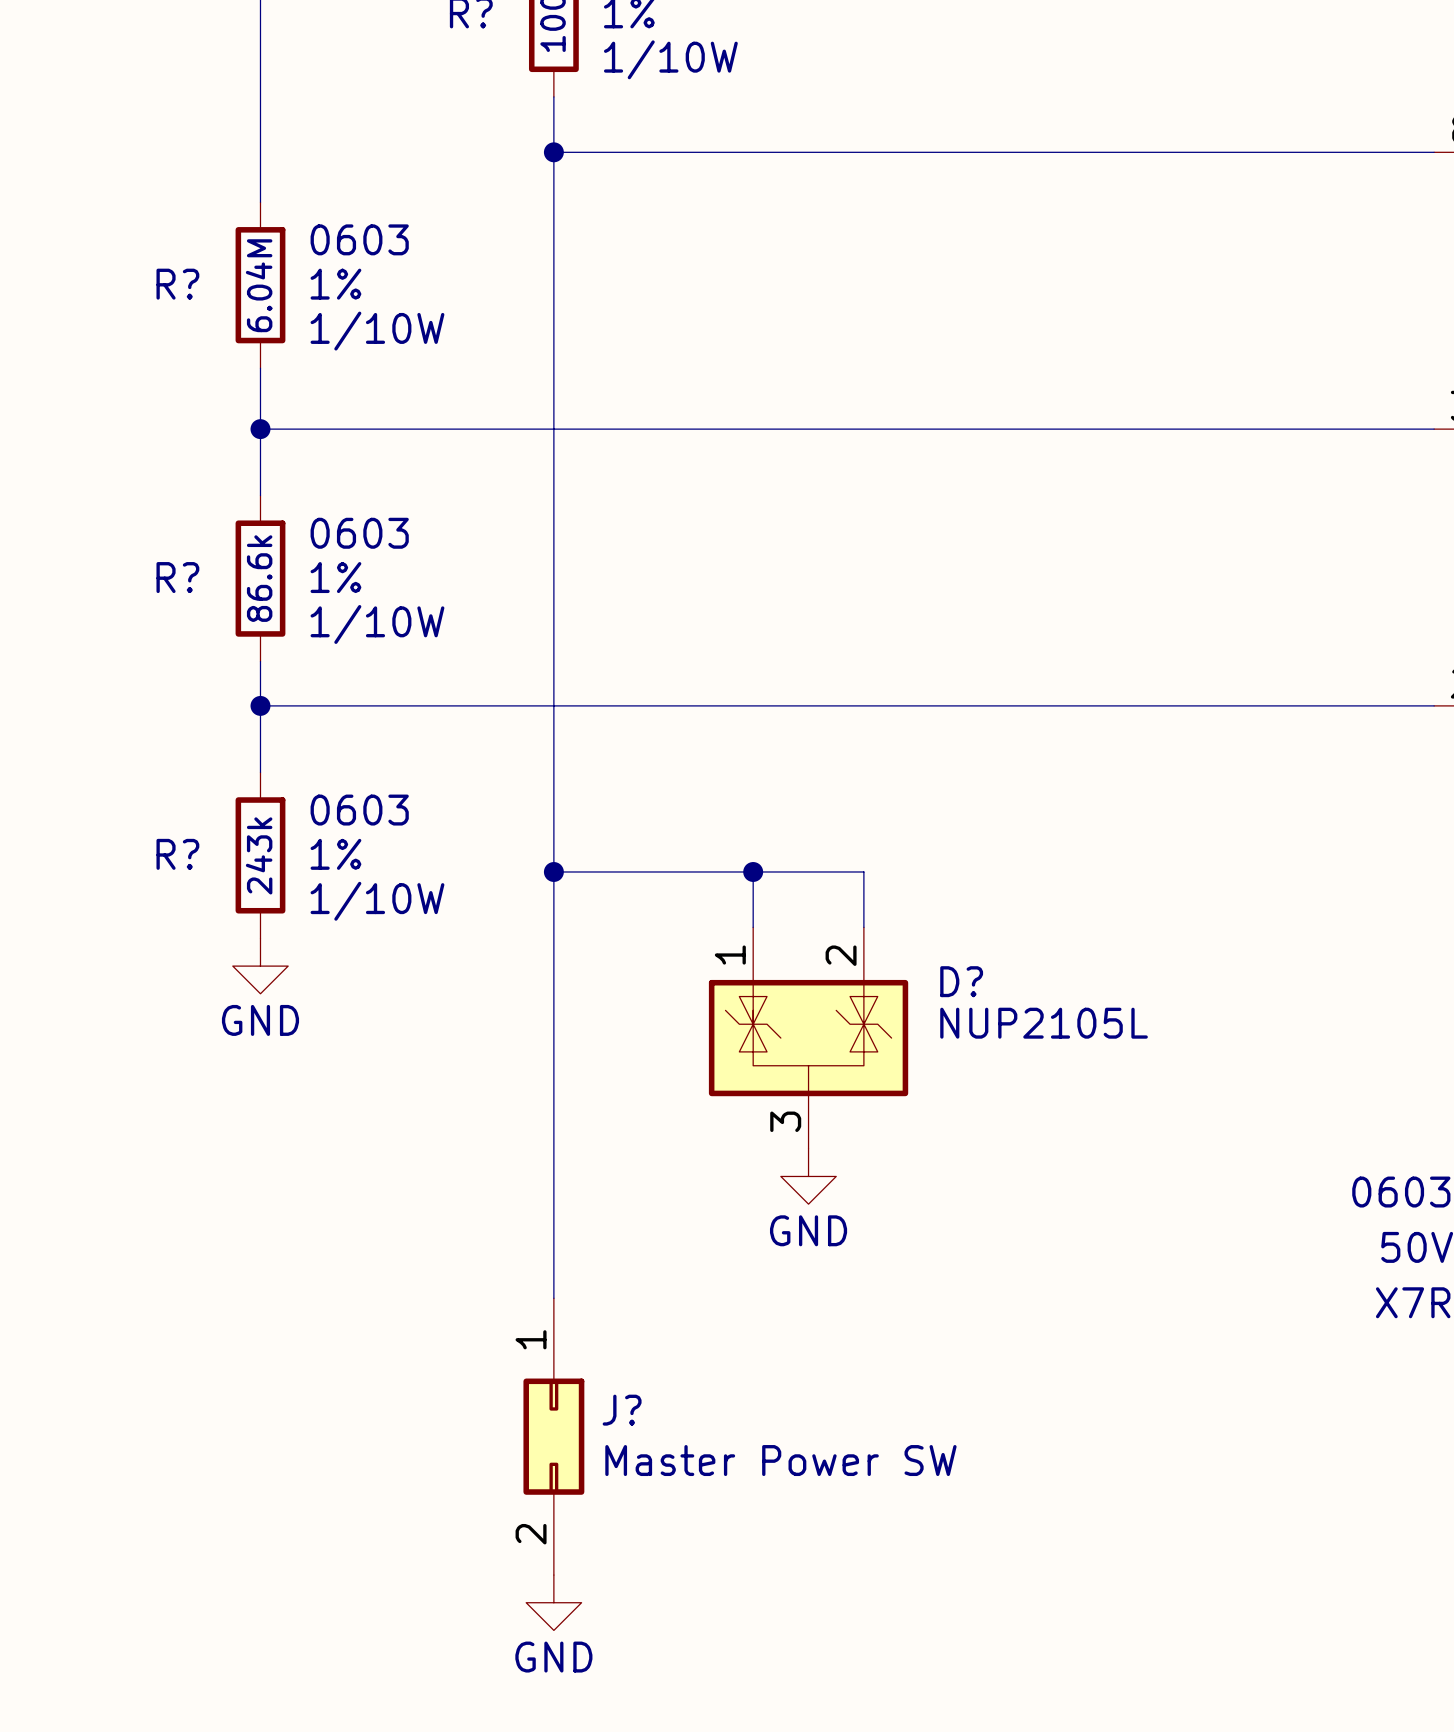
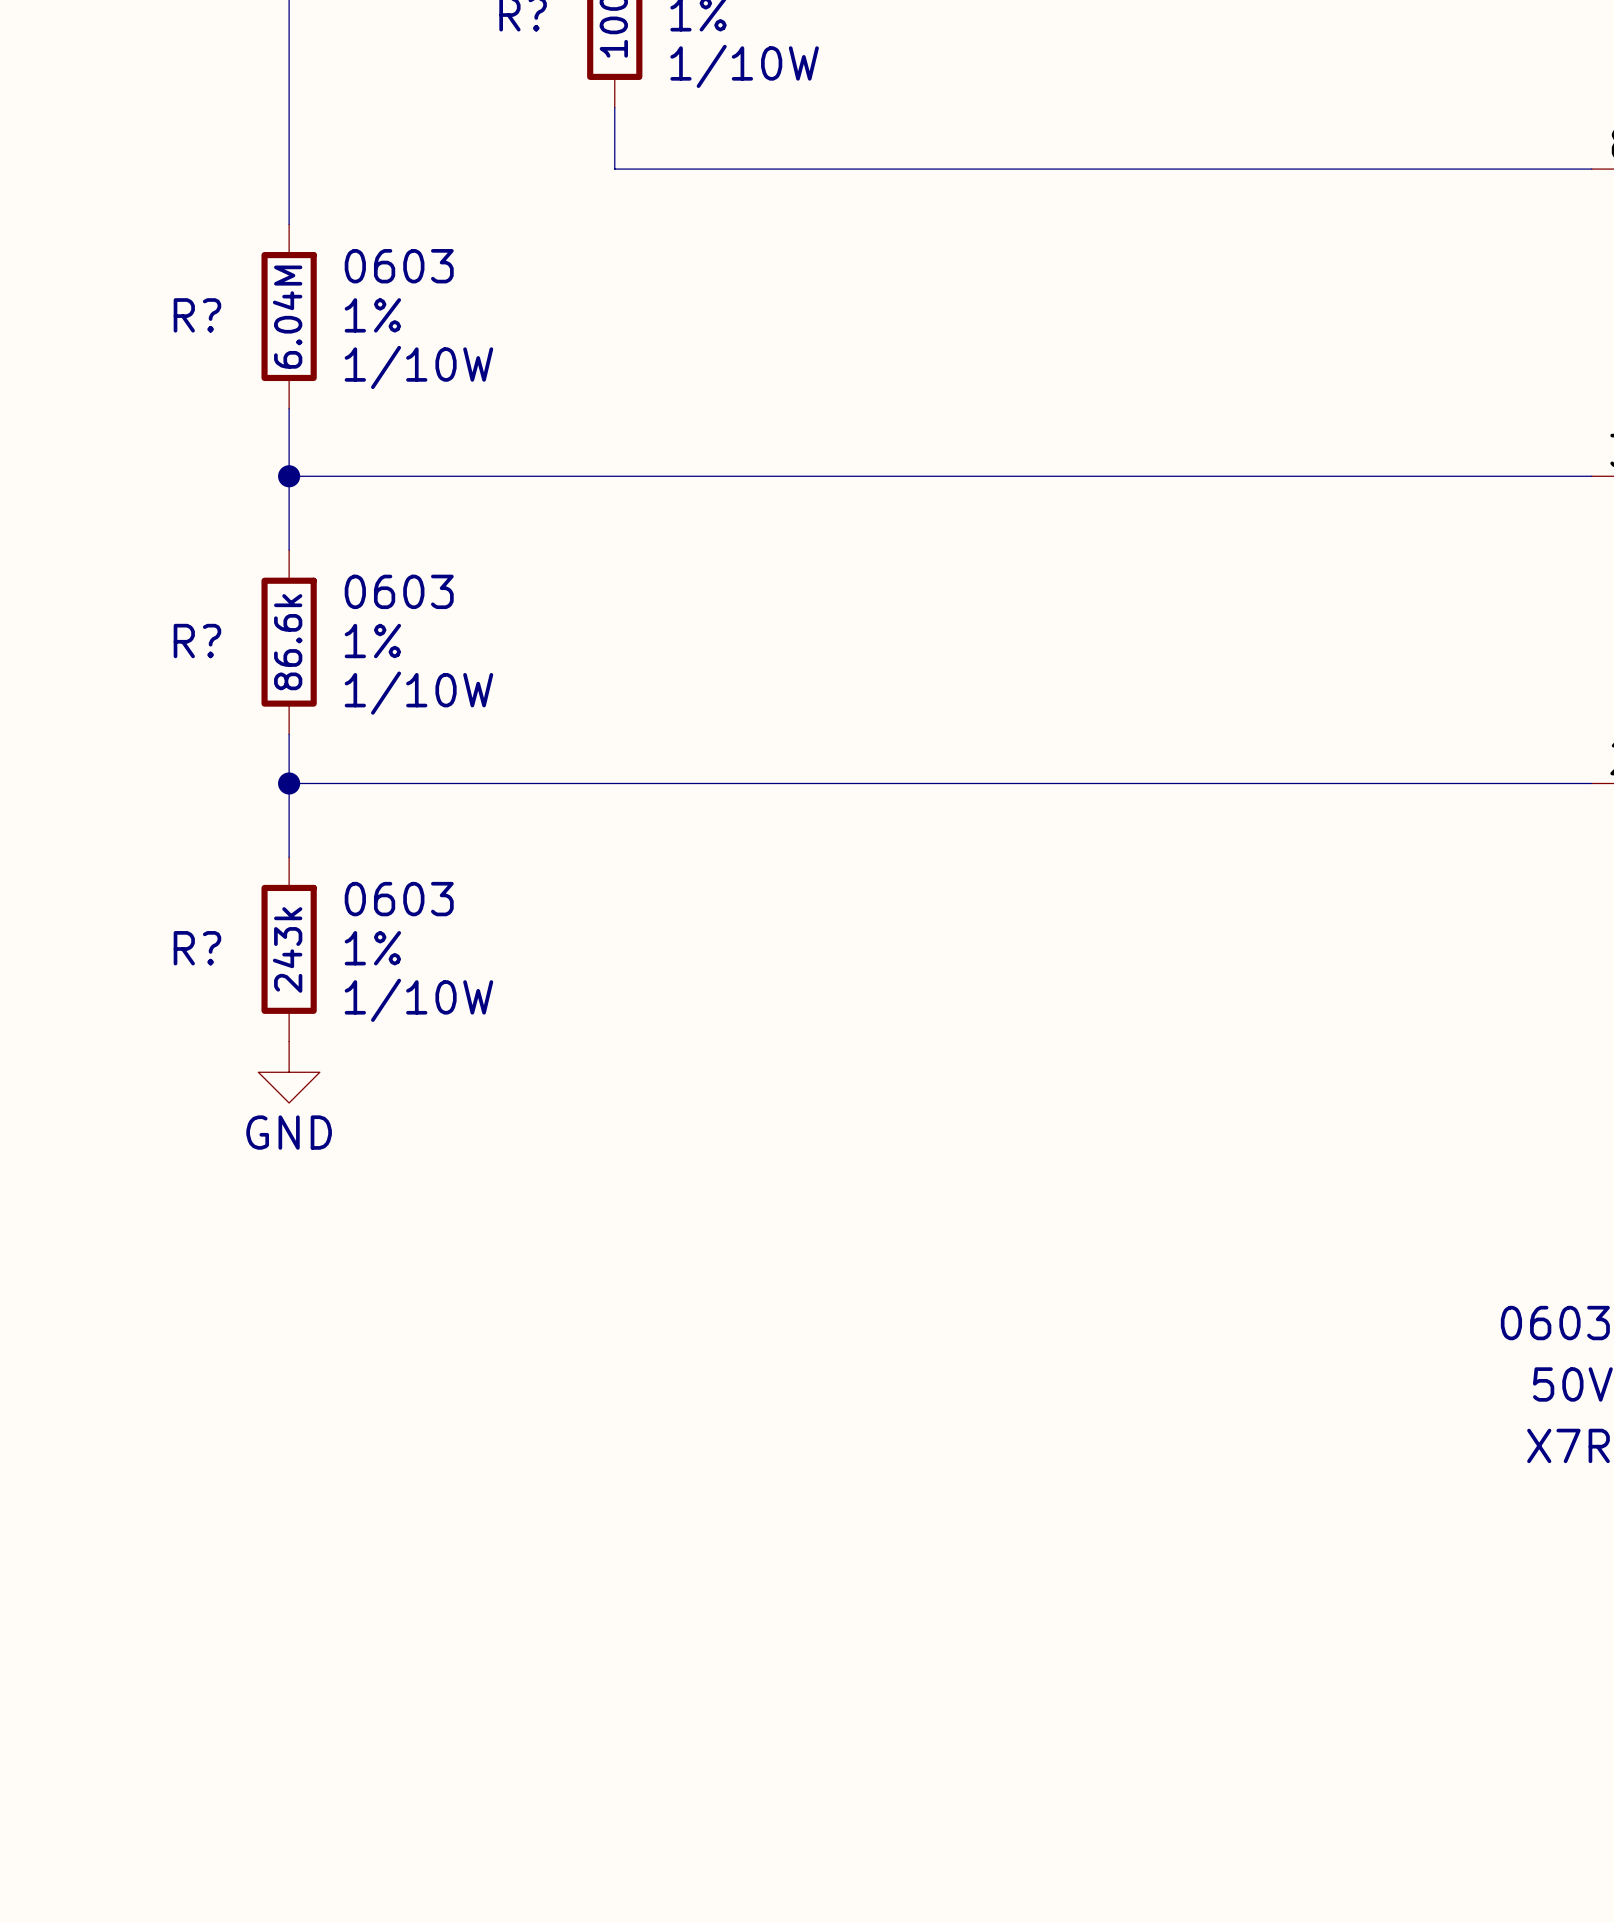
wire: (553, 152) (553, 1298) -> none
junction: (553, 152) -> none
wire: (553, 871) (863, 871) (863, 927) -> none
junction: (553, 871) -> none
wire: (753, 871) (753, 927) -> none
junction: (753, 871) -> none
D?: NUP2105L (808, 1038) -> none
power symbol: GND (808, 1176) -> none
J?: Master Power SW (553, 1436) -> none
power symbol: GND (553, 1602) -> none

